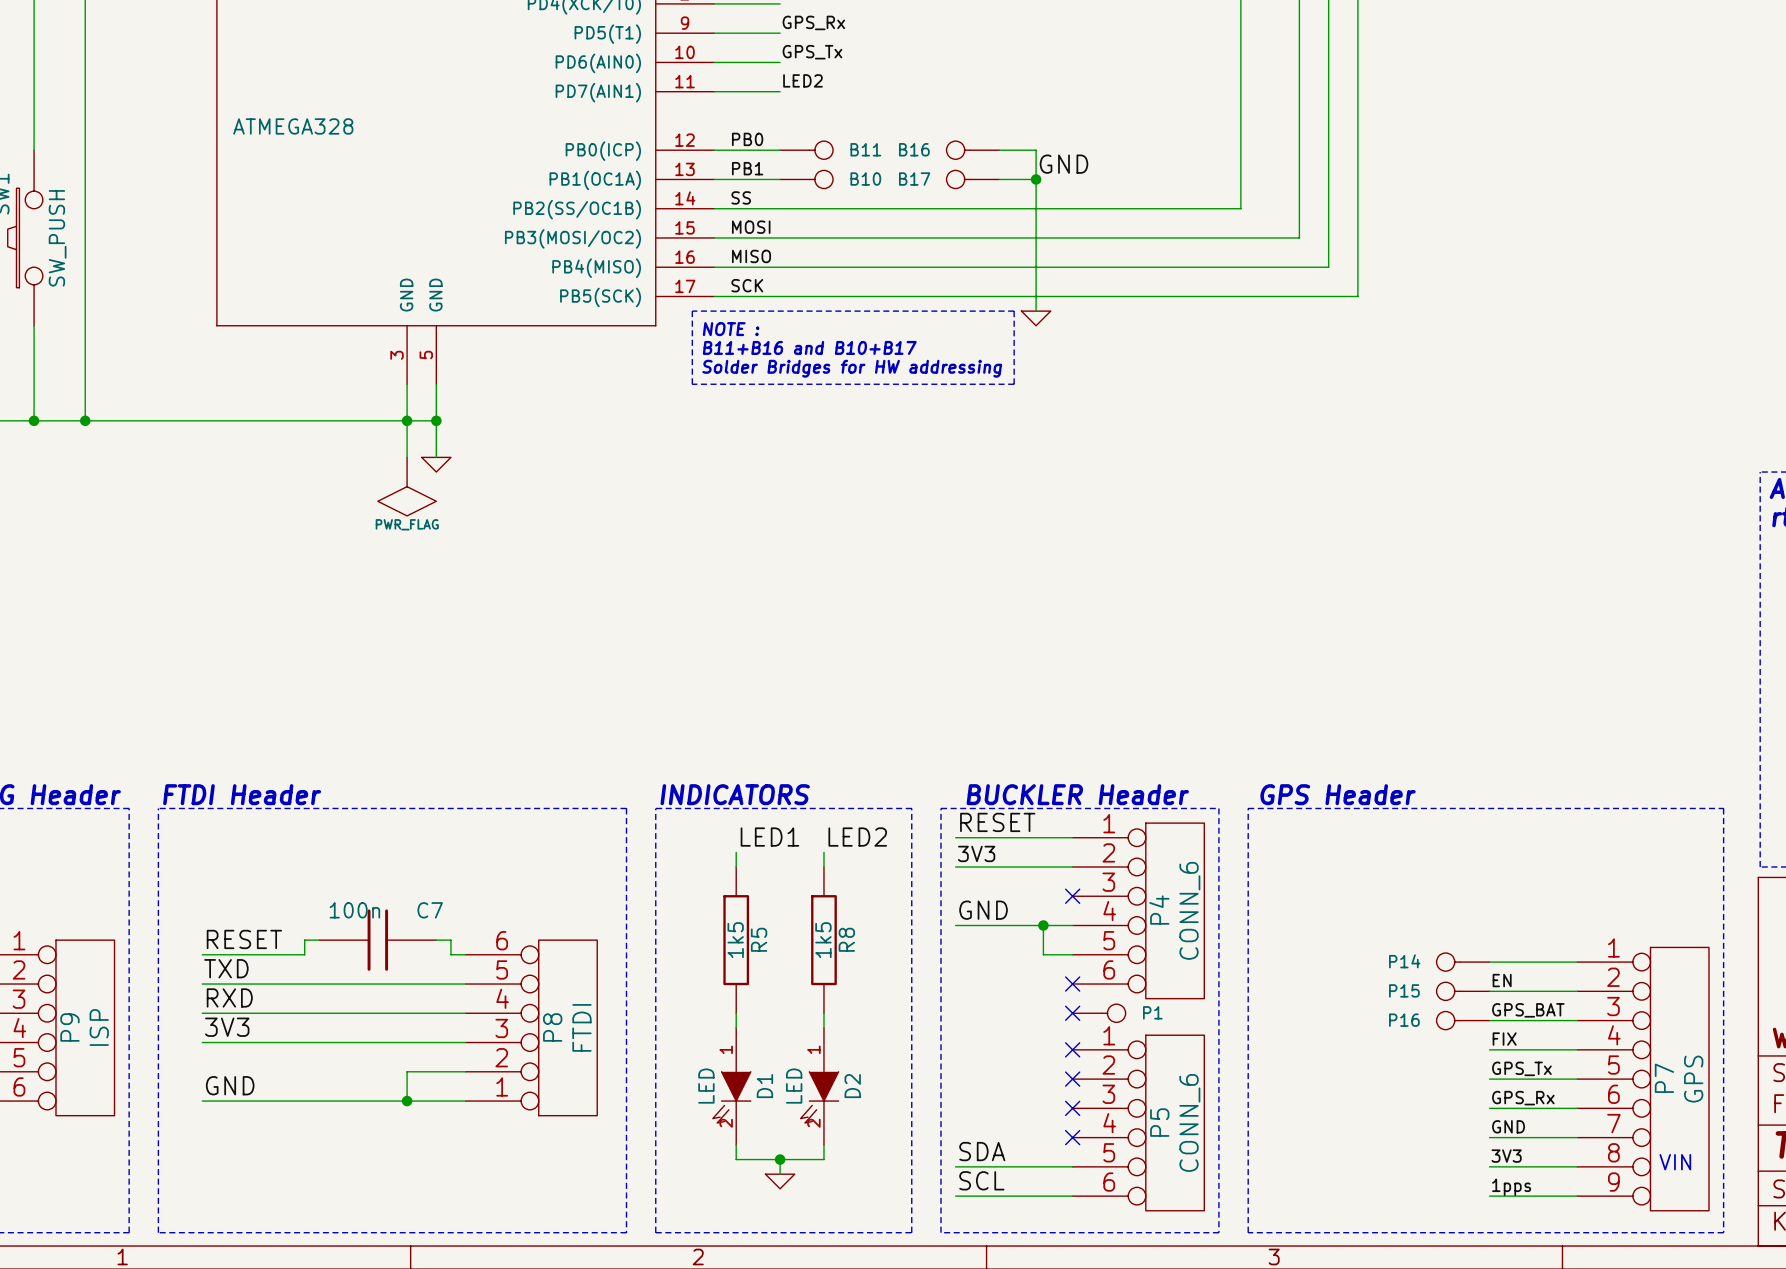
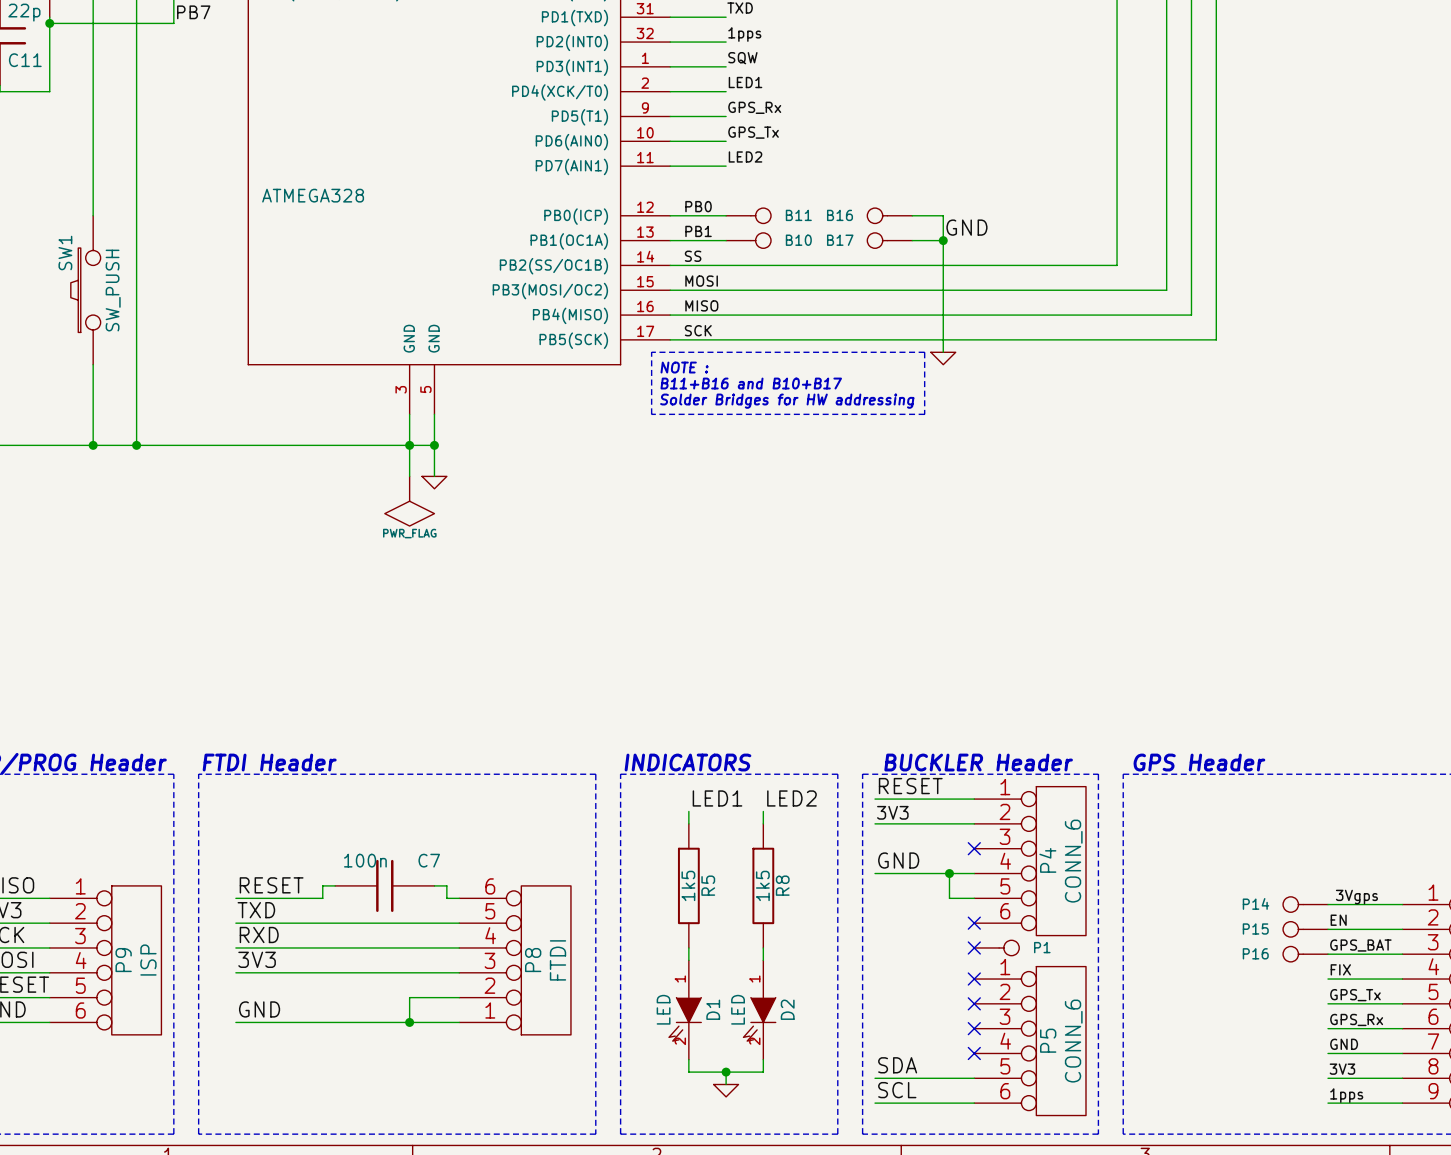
label: none -> 3Vgps (1356, 897)

